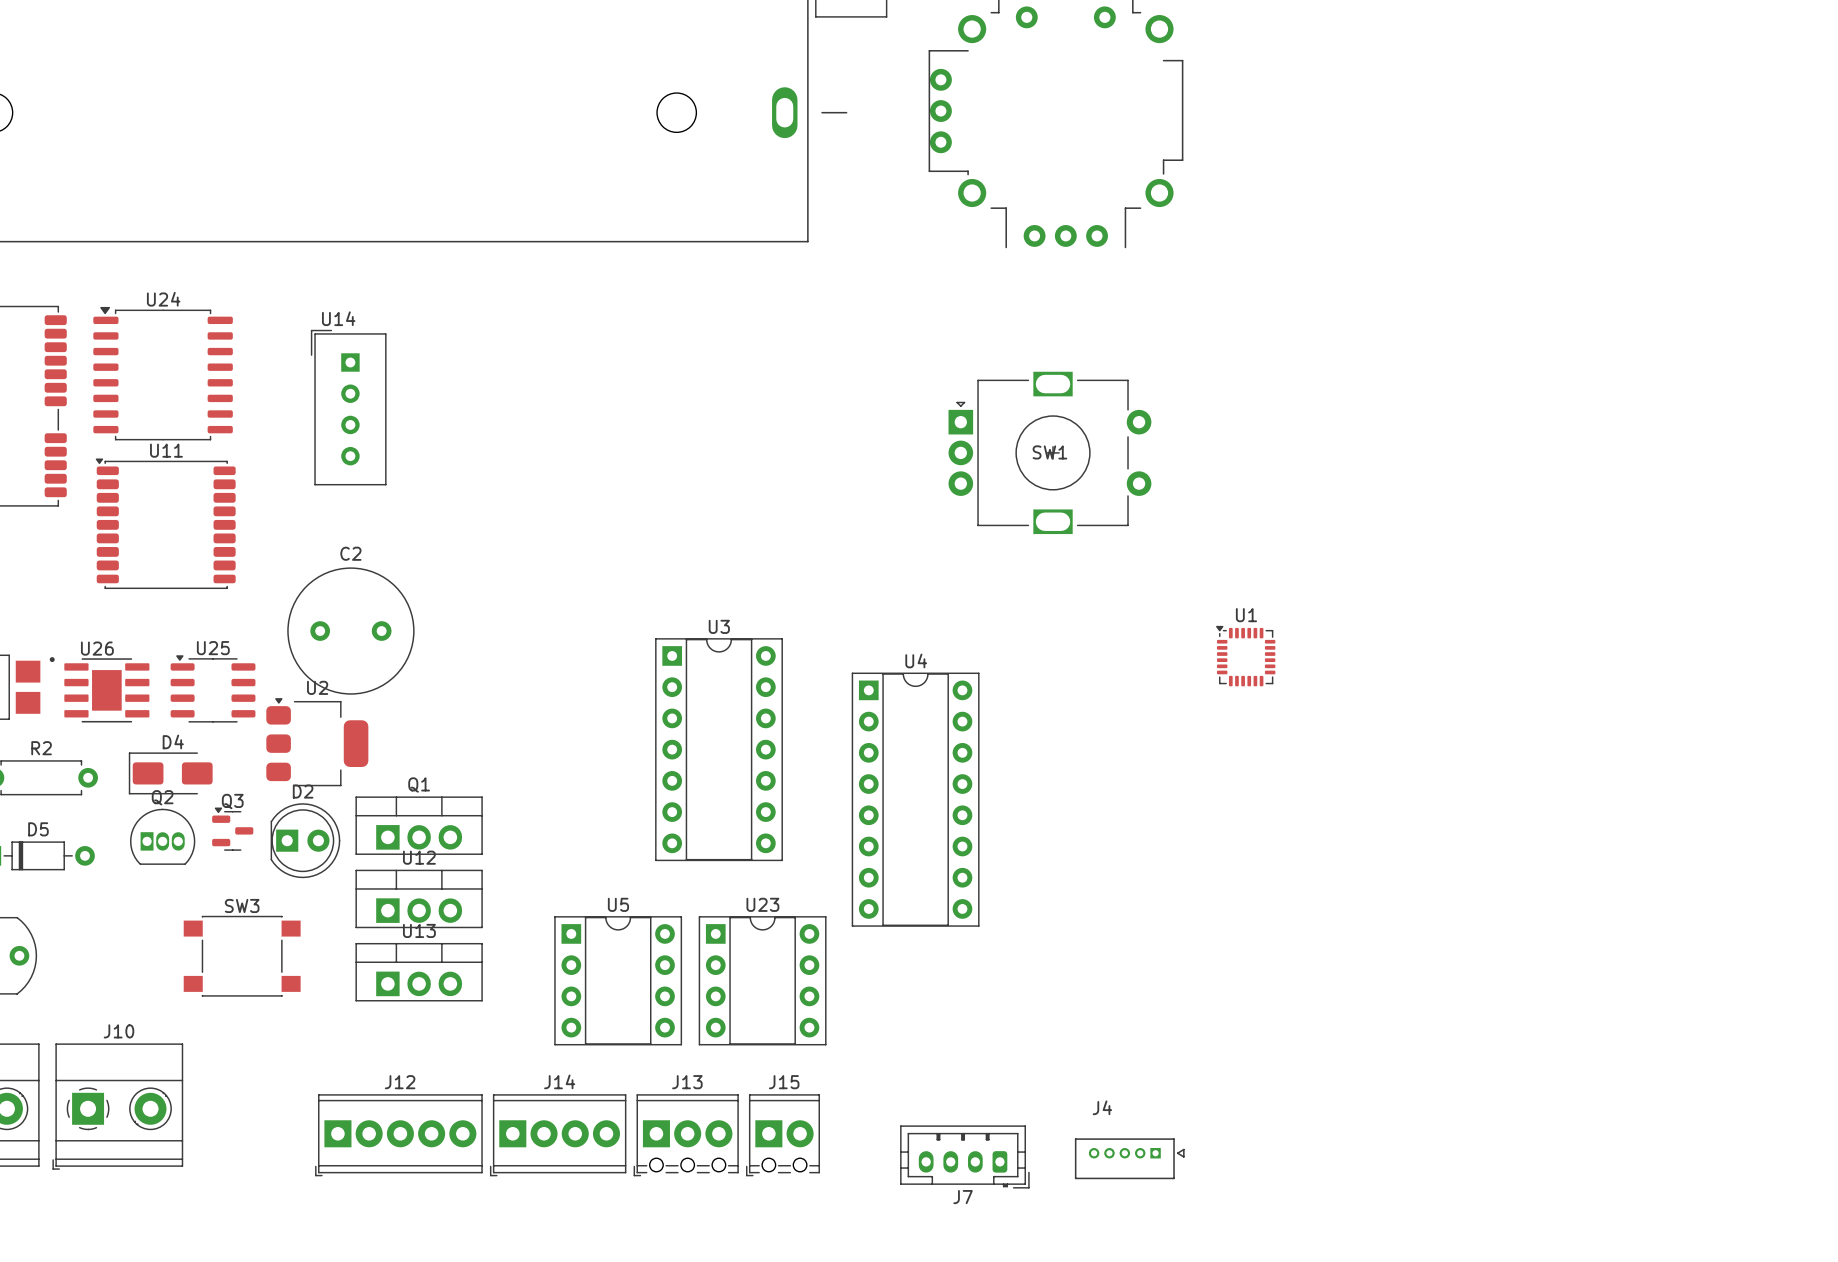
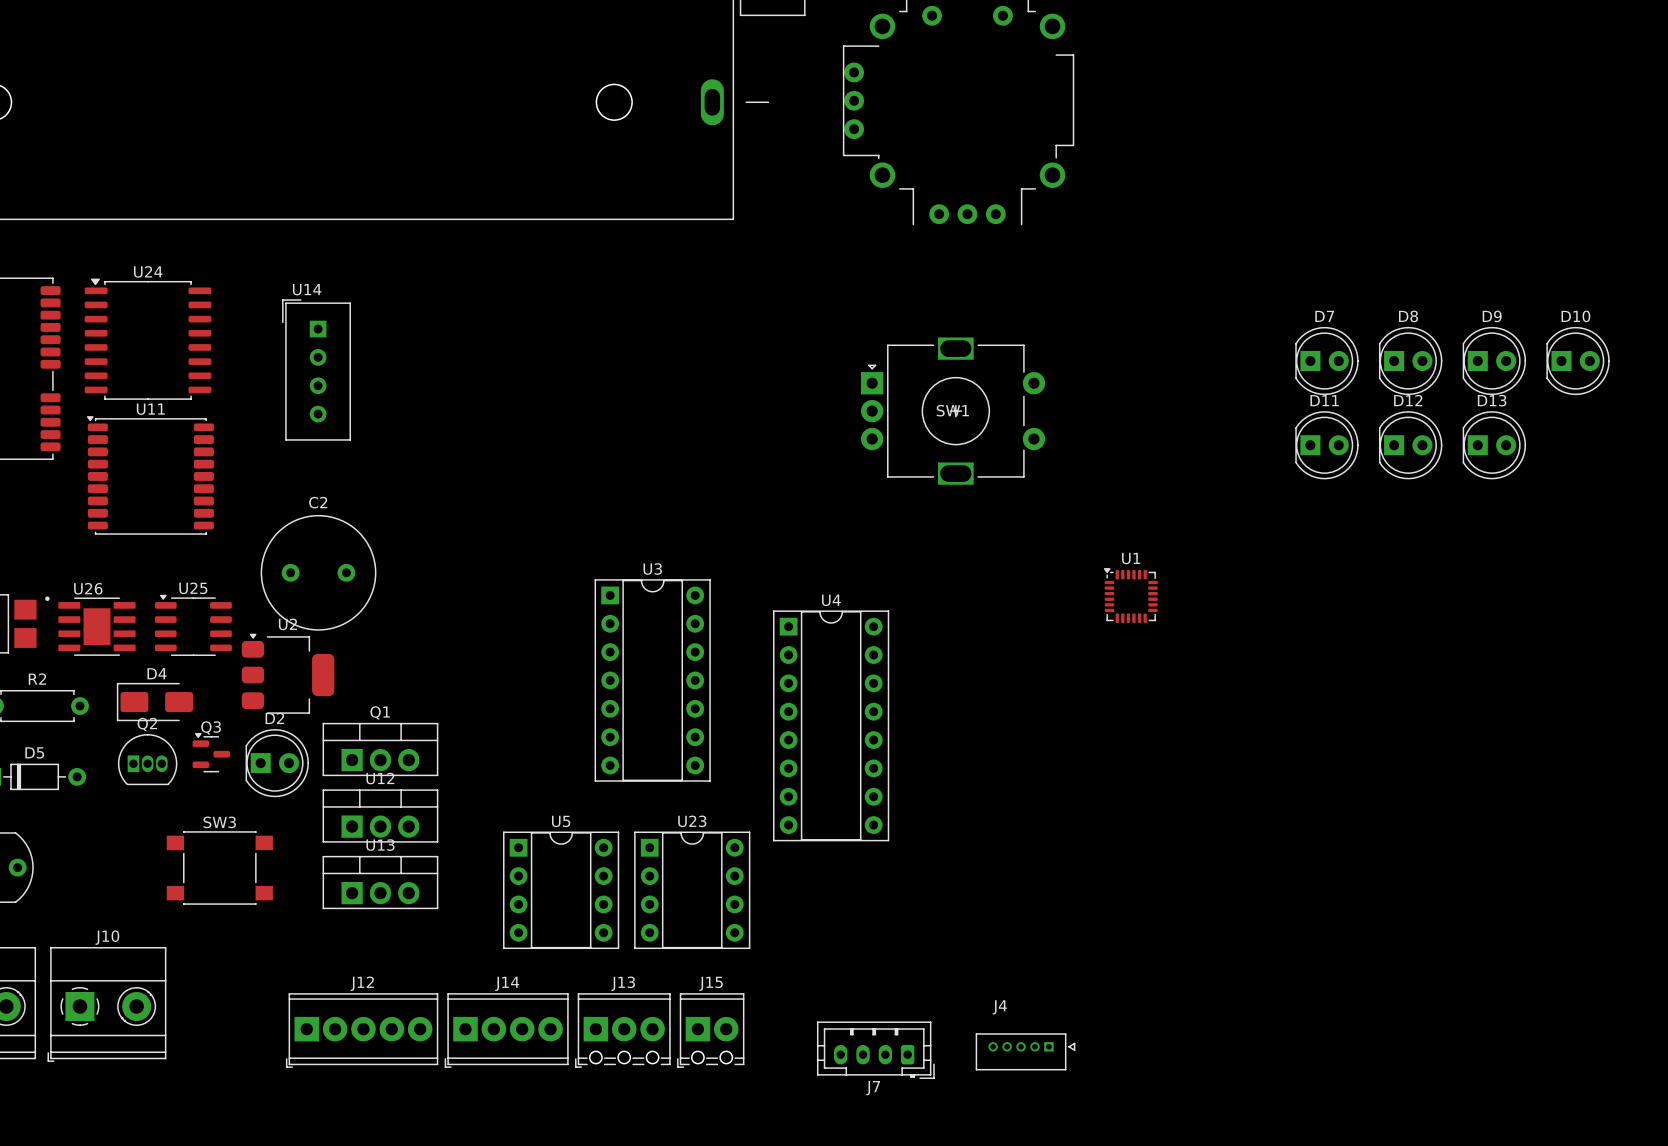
D7: none -> (1326, 361)
D8: none -> (1410, 361)
D9: none -> (1494, 361)
D10: none -> (1578, 361)
D11: none -> (1326, 445)
D12: none -> (1410, 445)
D13: none -> (1494, 445)

